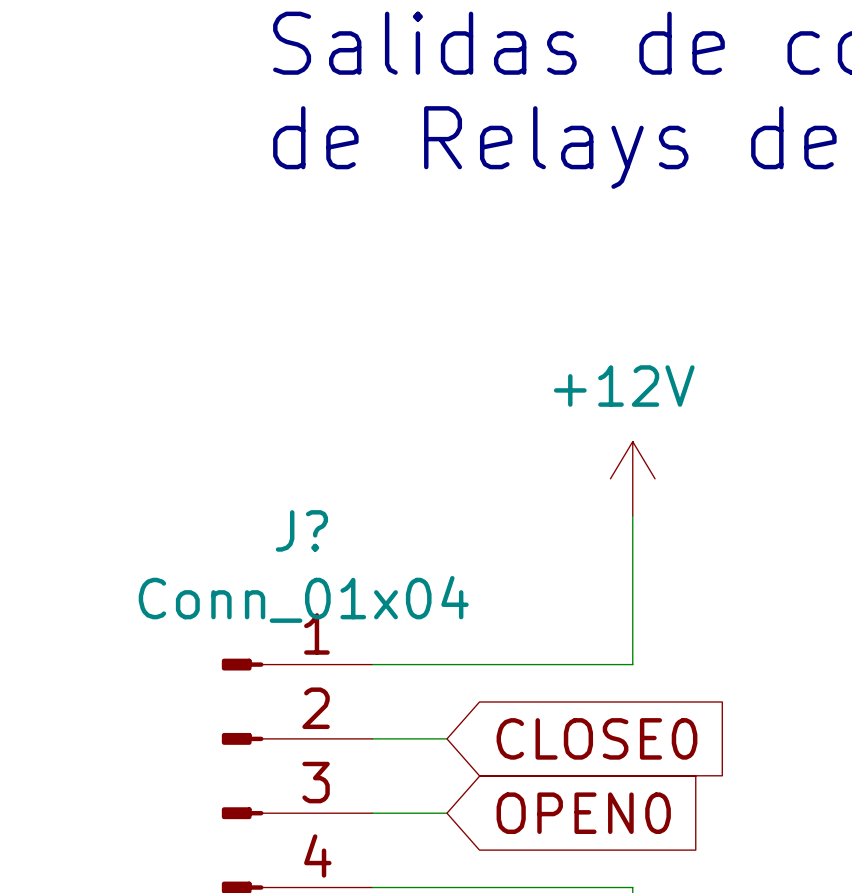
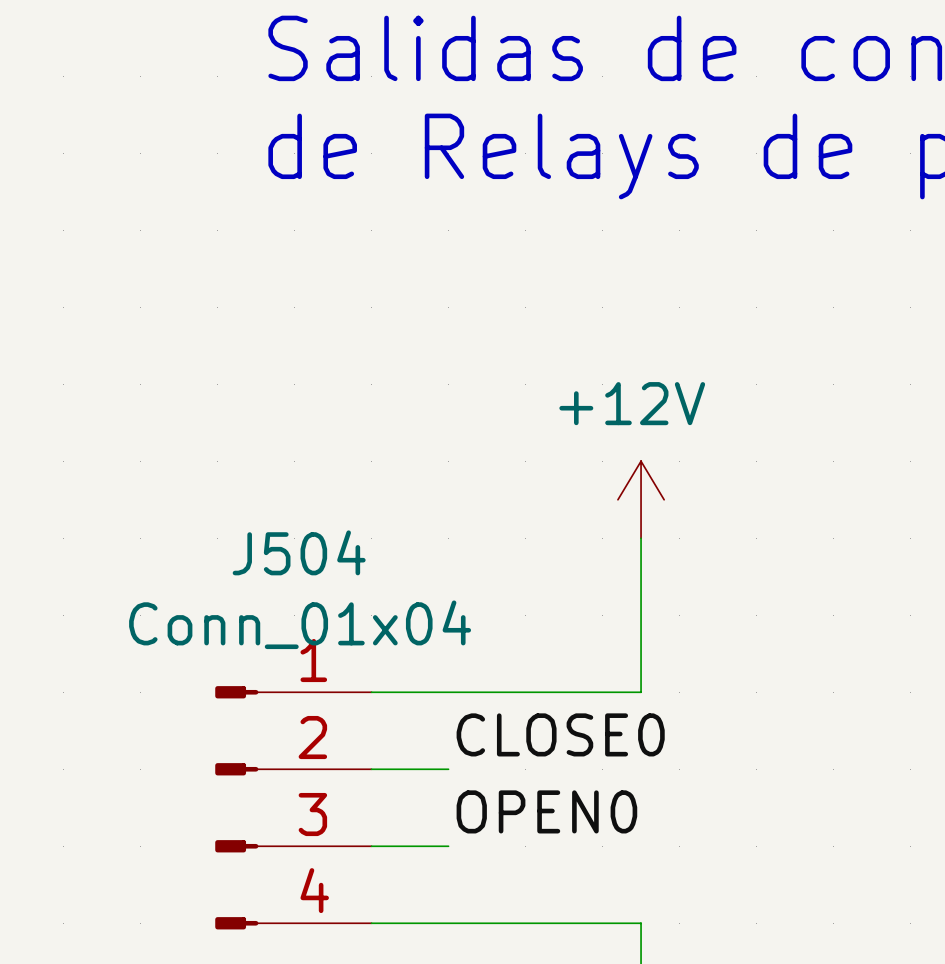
J? name: J? (301, 530) -> J504 (299, 552)
label: none -> CLOSE0 (560, 734)
global label: CLOSE0 (596, 738) -> none
label: none -> OPEN0 (546, 811)
global label: OPEN0 (583, 813) -> none

